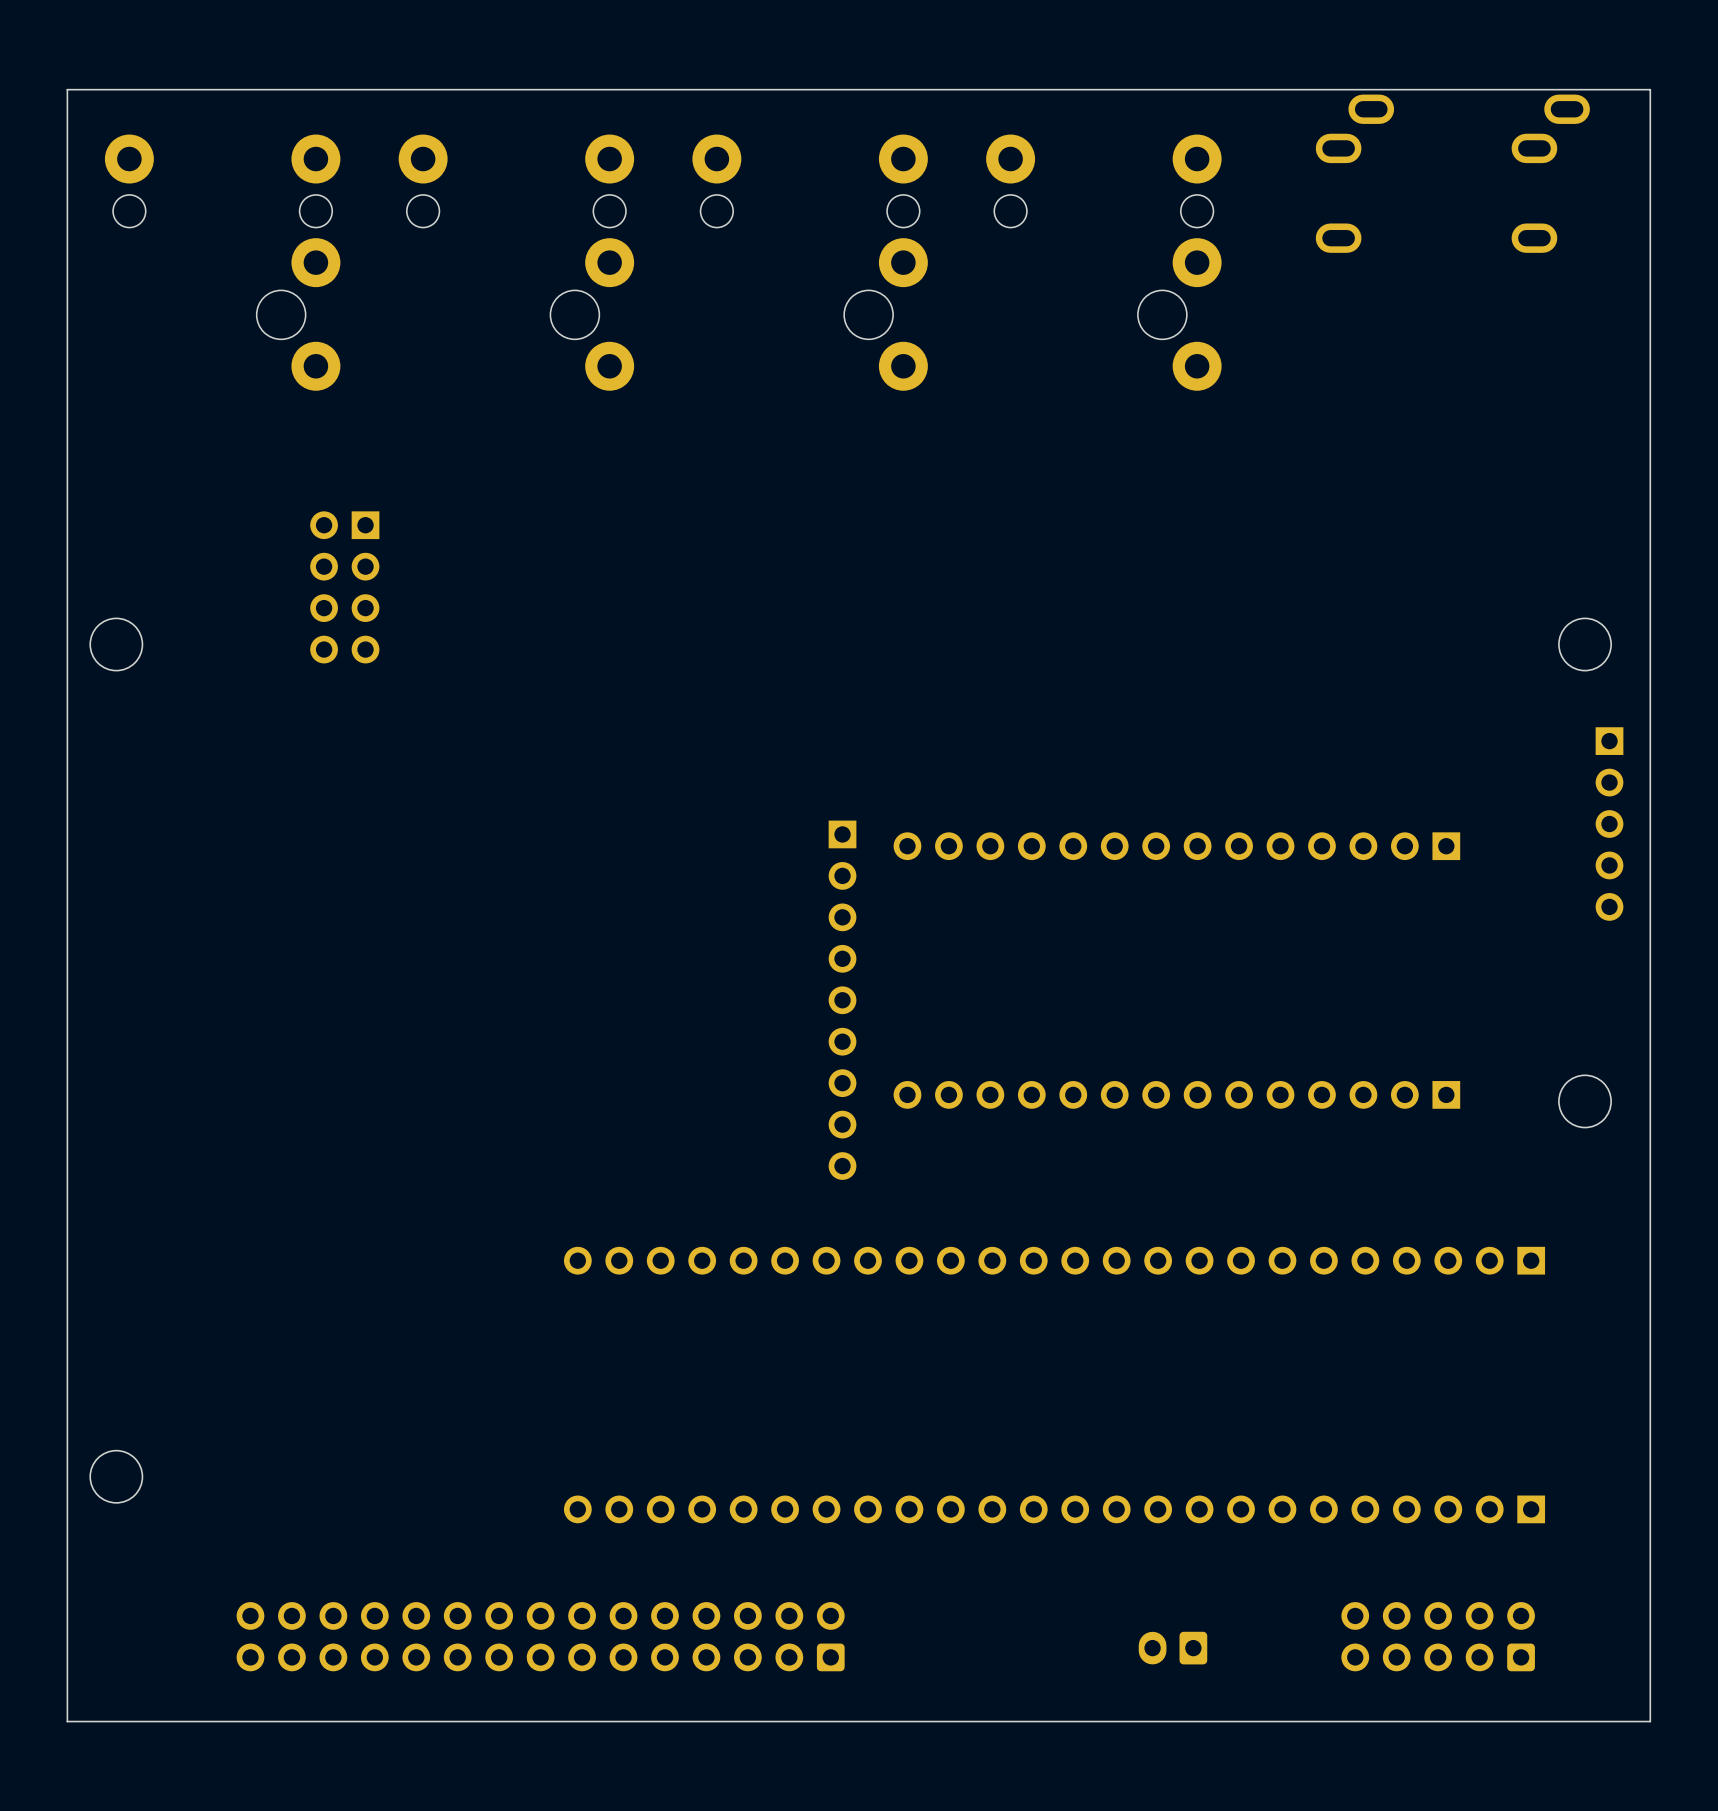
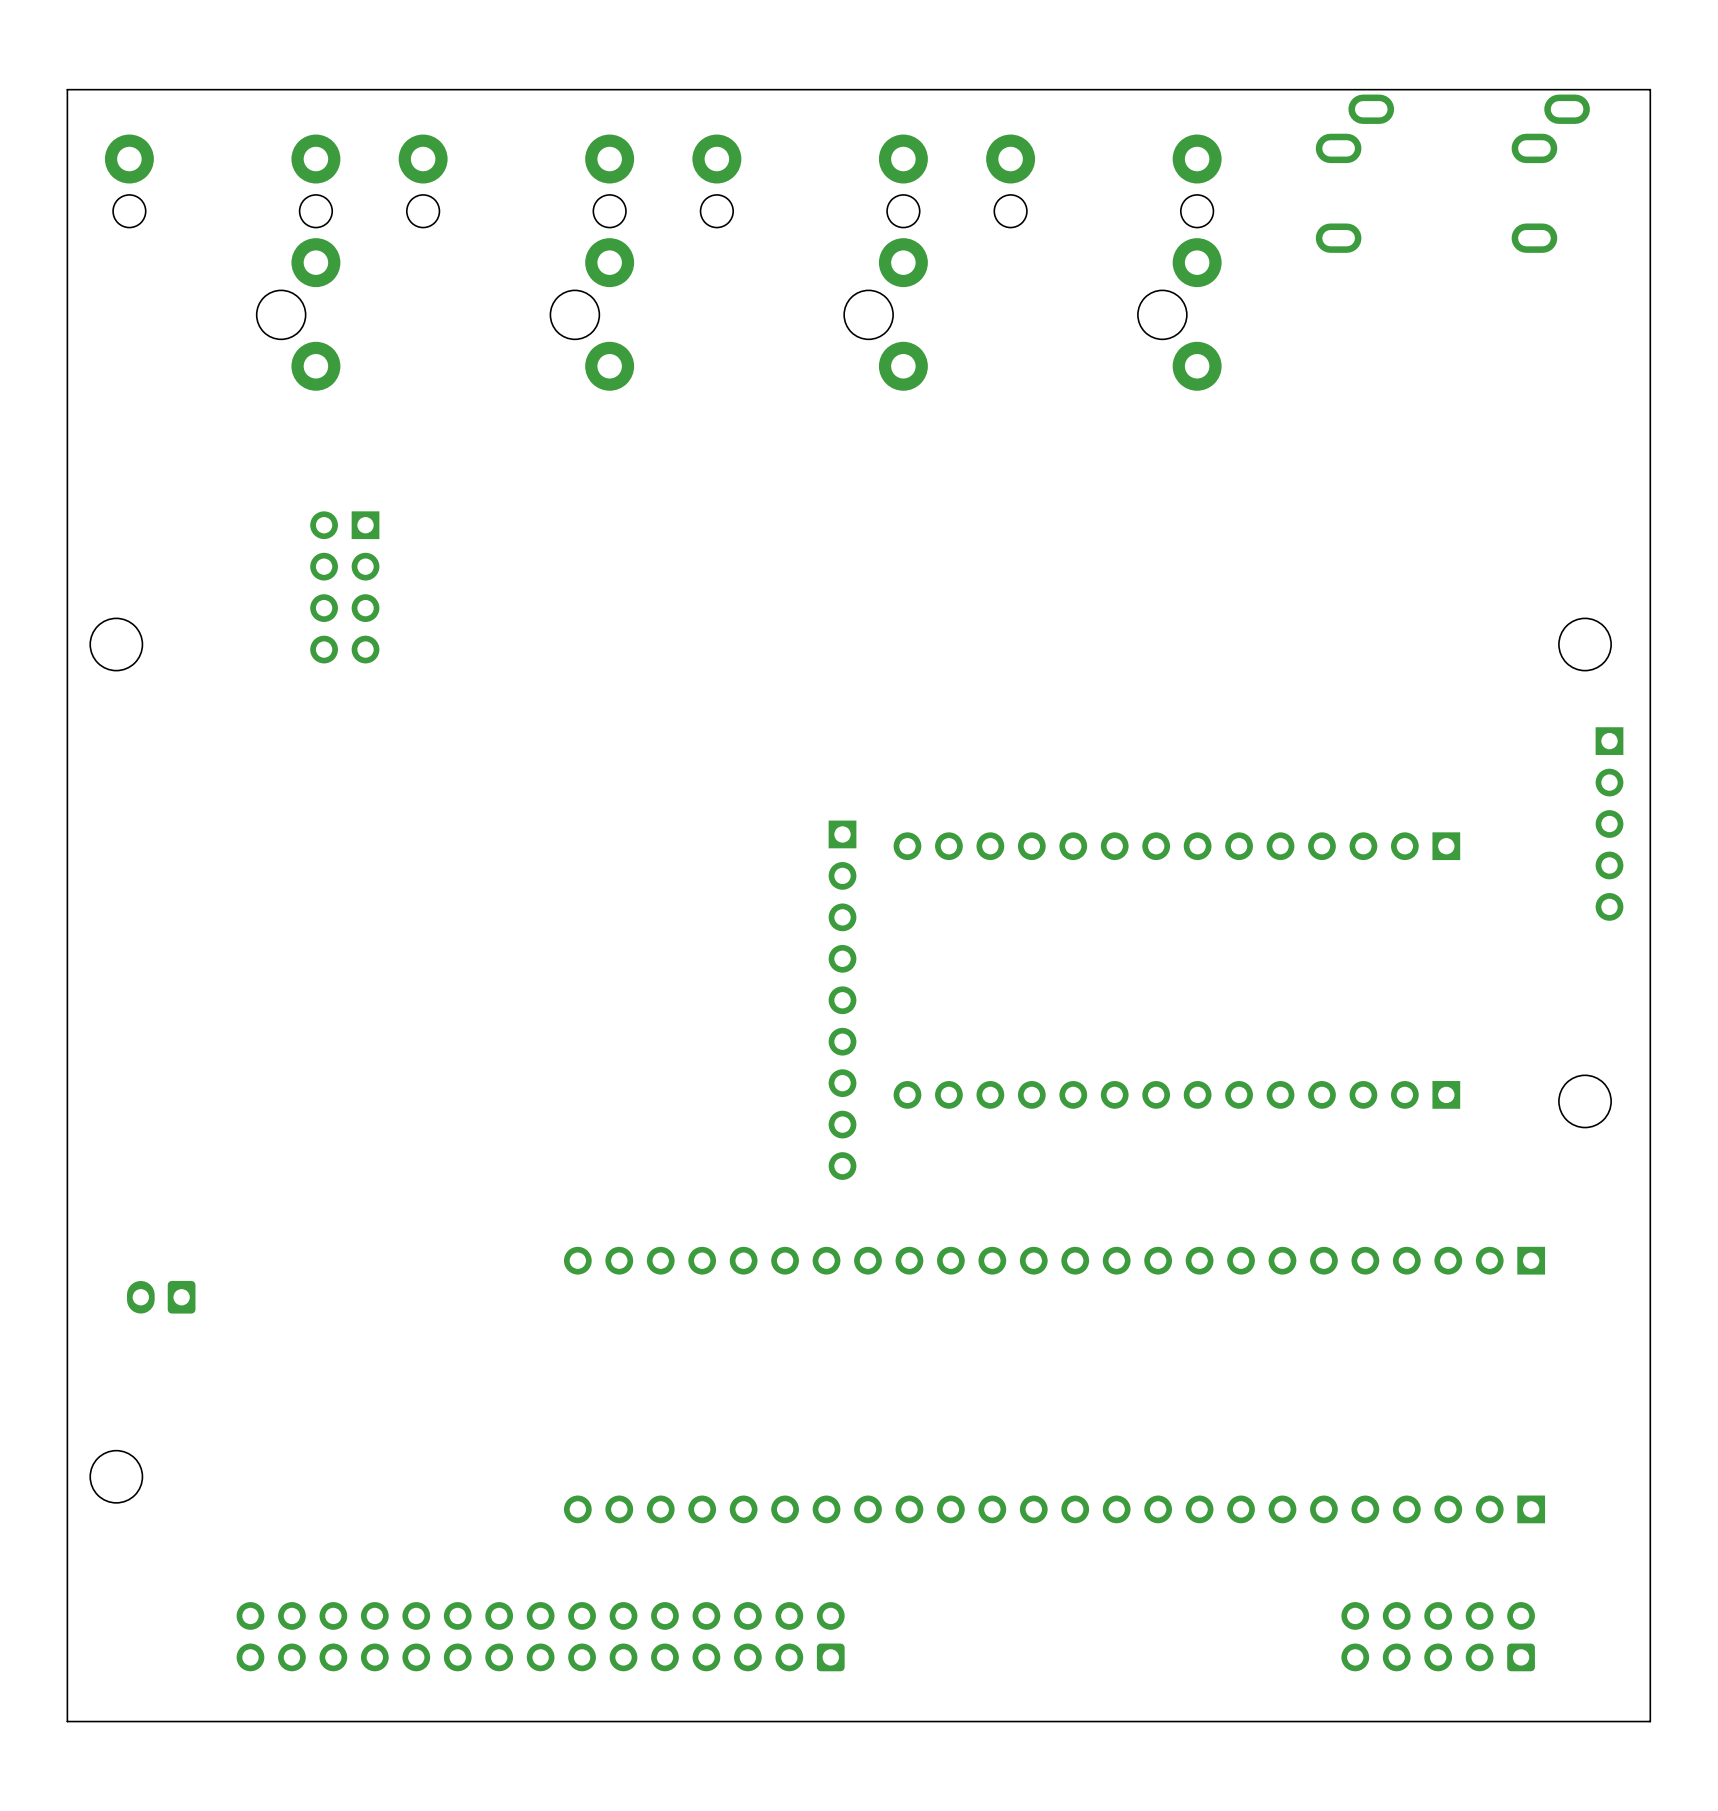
part: none -> (161, 1297)
part: (1172, 1648) -> none

